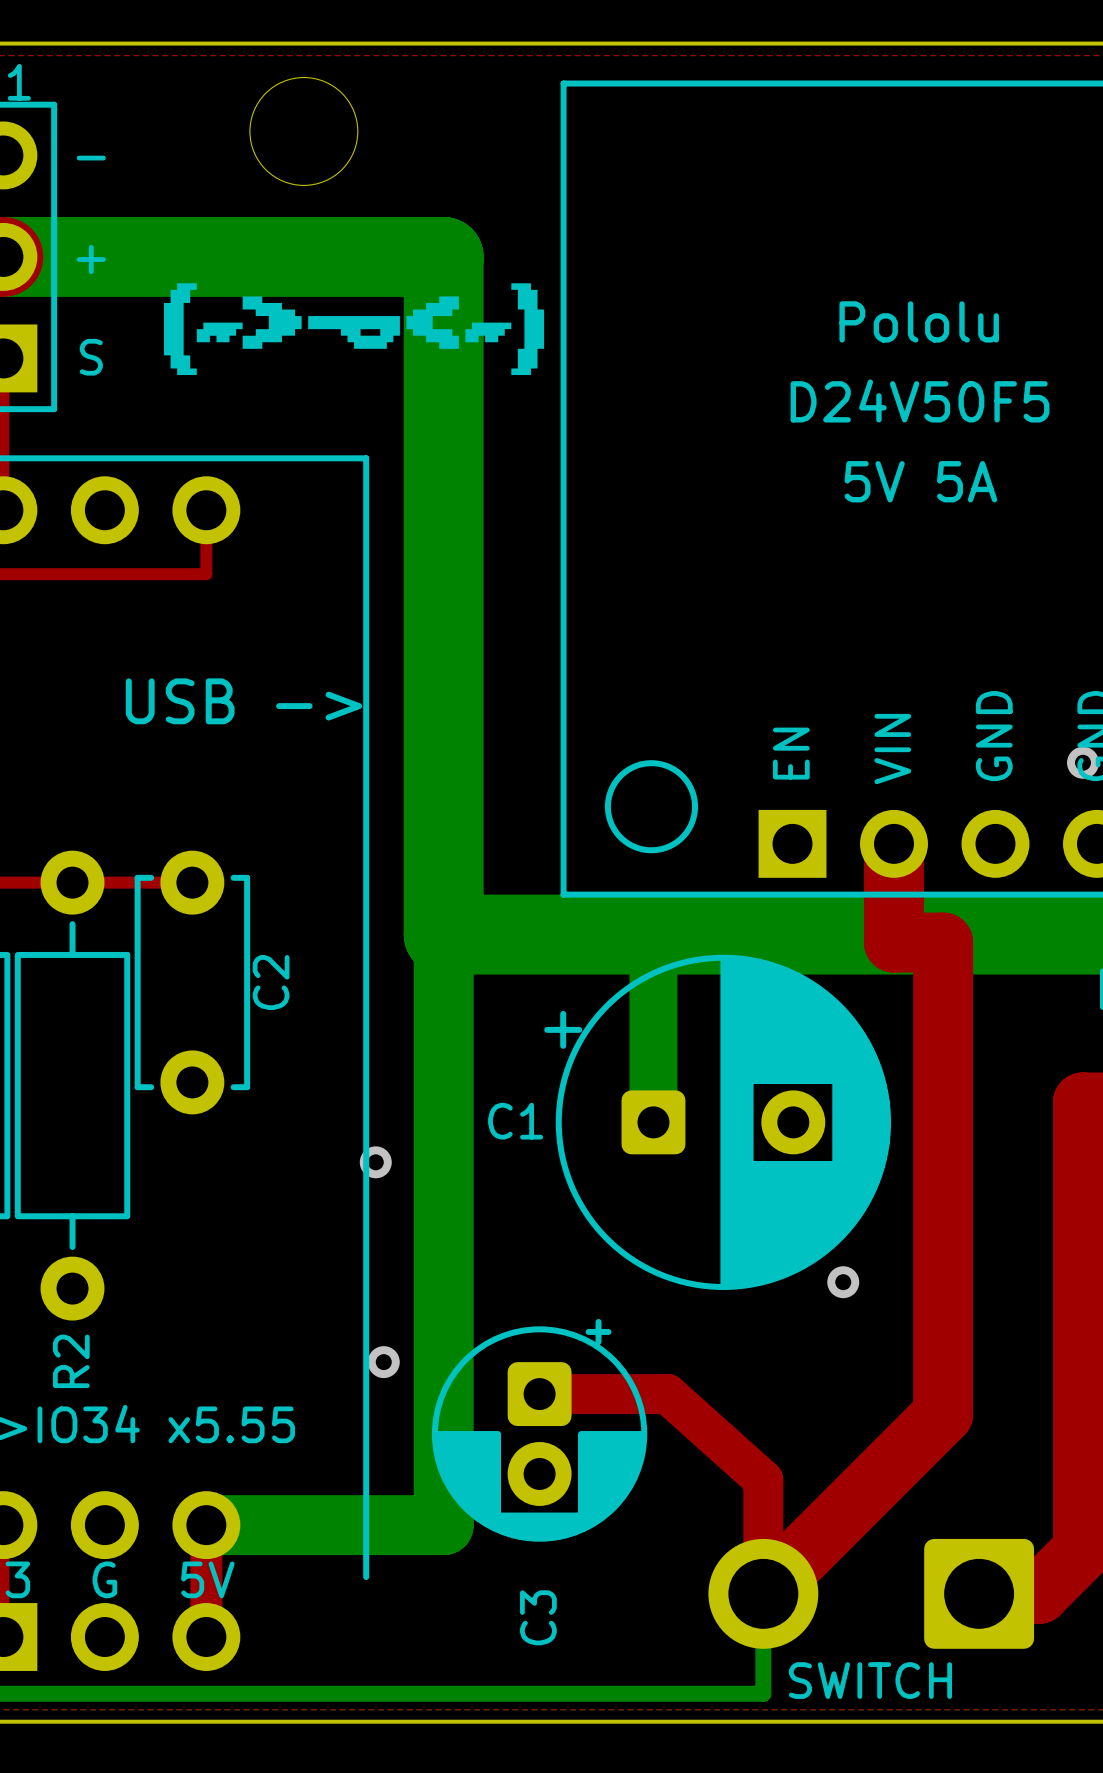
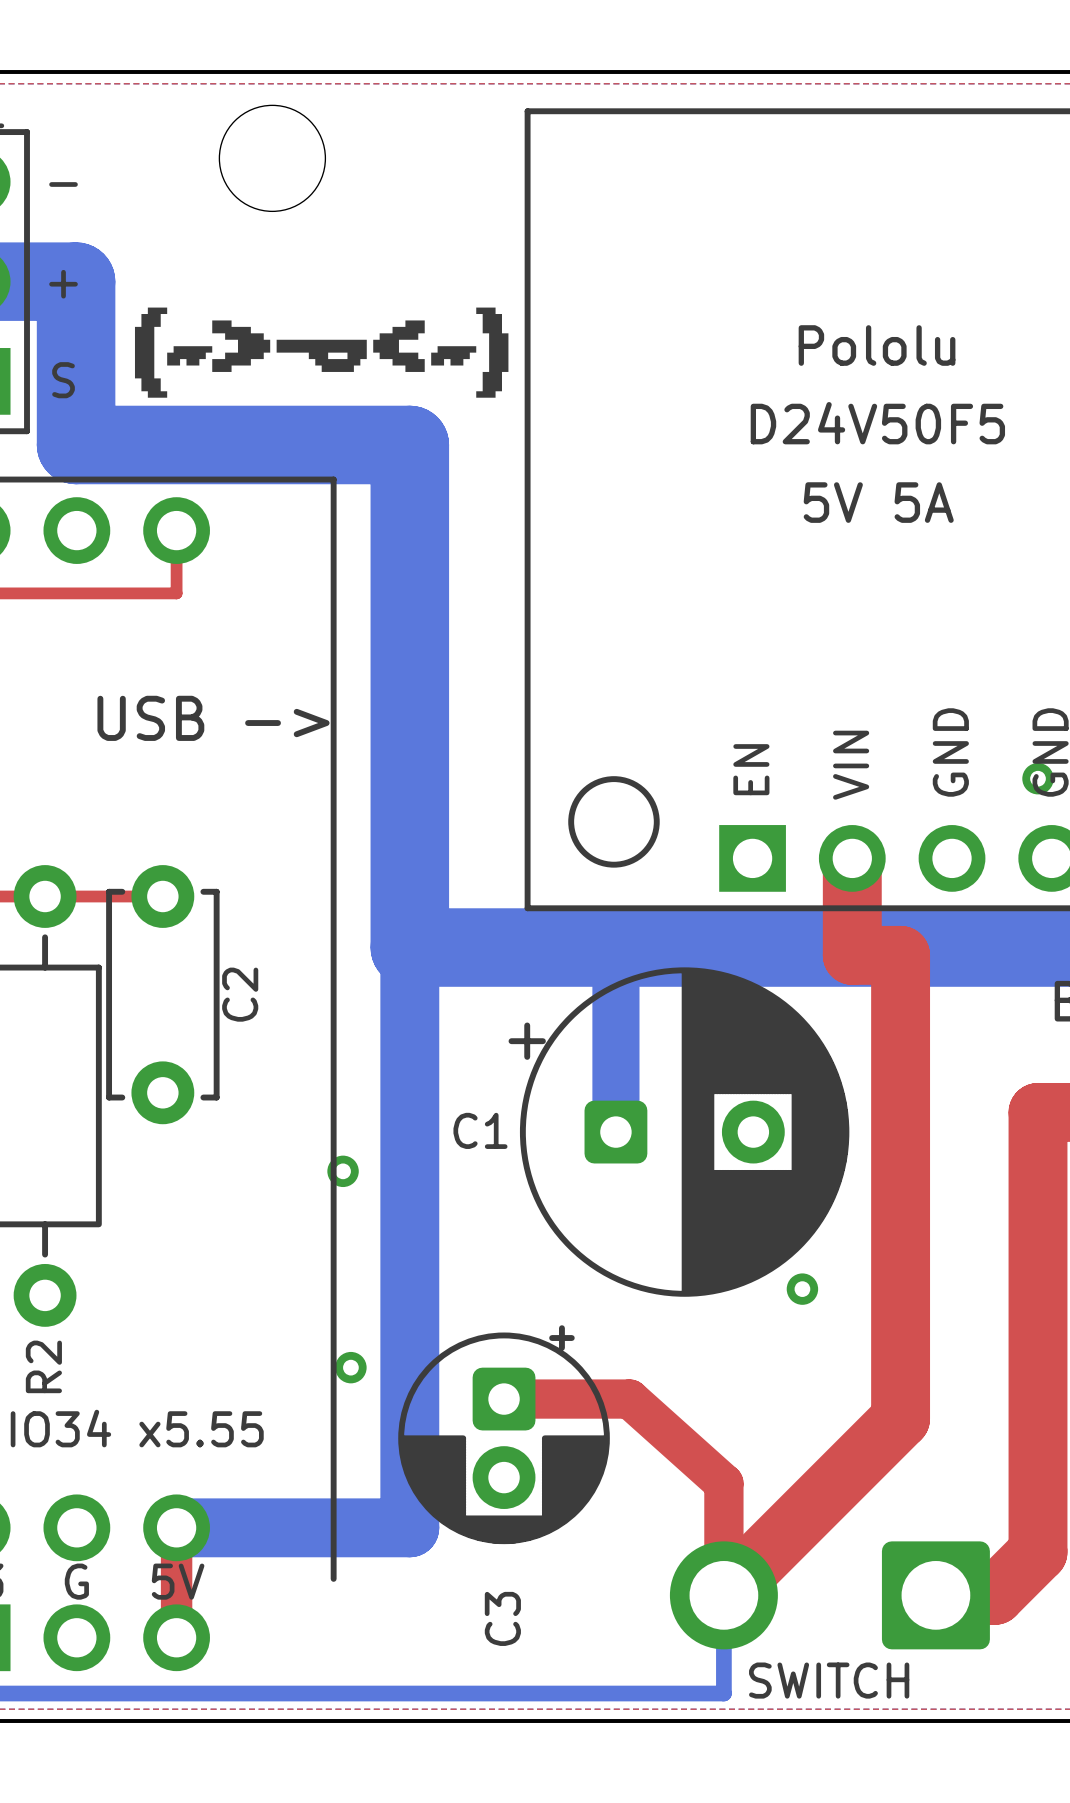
bottom track: (104, 256) (443, 256) (443, 423) -> (76, 281) (76, 444) (409, 444)

